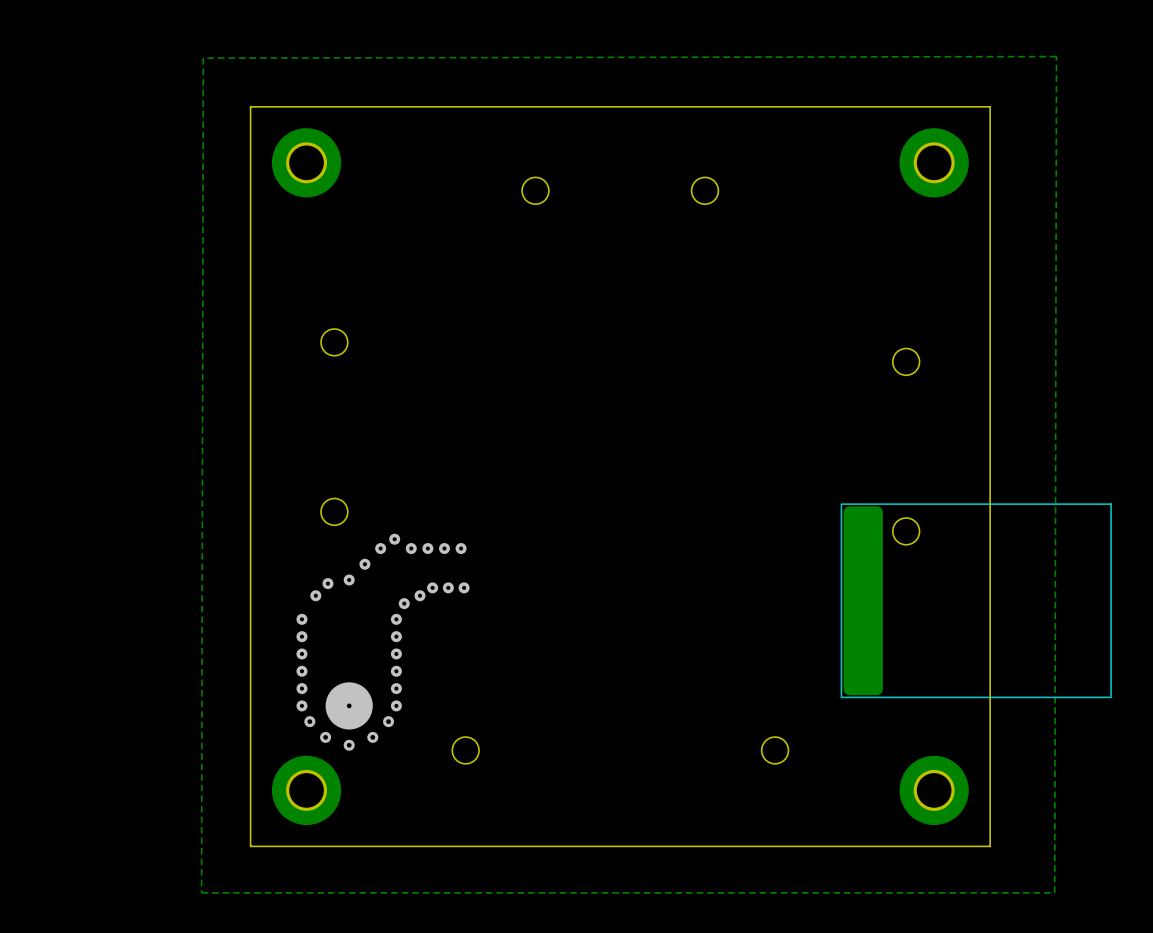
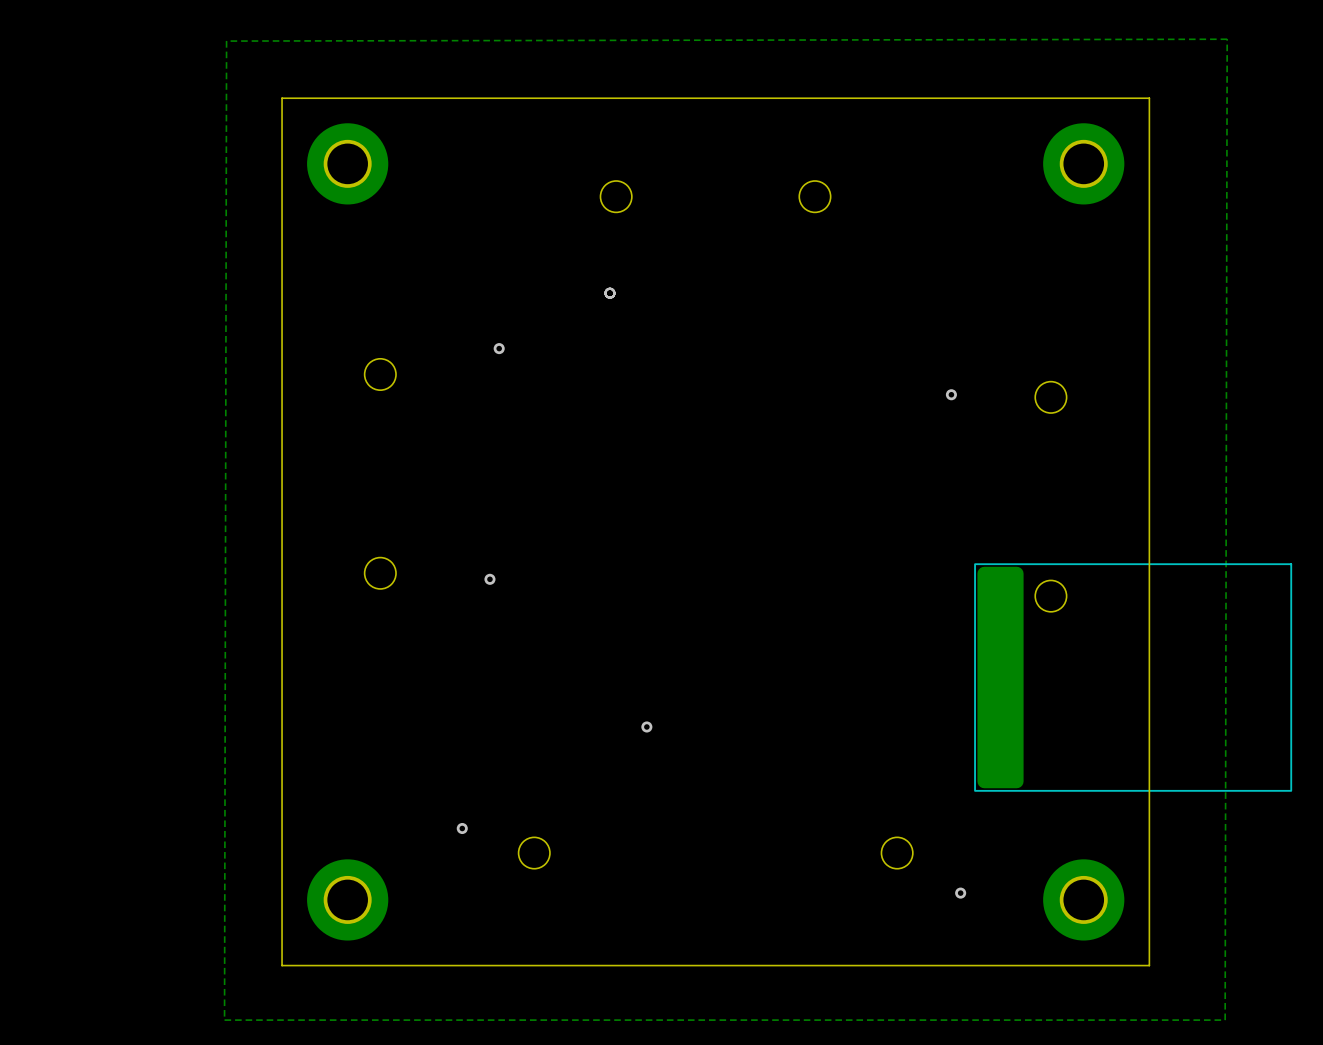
via: none -> (609, 293)
via: none -> (499, 348)
via: none -> (951, 394)
via: none -> (489, 579)
via: (394, 539) -> none
via: (380, 548) -> none
via: (411, 548) -> none
via: (427, 548) -> none
via: (444, 548) -> none
via: (461, 548) -> none
via: (364, 564) -> none
via: (349, 580) -> none
via: (327, 583) -> none
via: (432, 587) -> none
via: (448, 587) -> none
via: (464, 587) -> none
via: (315, 595) -> none
via: (420, 595) -> none
via: (404, 603) -> none
via: (301, 619) -> none
via: (396, 619) -> none
via: (301, 636) -> none
via: (396, 636) -> none
via: none -> (646, 726)
via: (301, 653) -> none
via: (396, 653) -> none
via: (301, 671) -> none
via: (396, 671) -> none
via: (301, 688) -> none
via: (396, 688) -> none
via: (301, 705) -> none
via: (349, 705) -> none
via: (396, 705) -> none
via: (309, 721) -> none
via: (388, 721) -> none
via: none -> (462, 828)
via: (325, 737) -> none
via: (372, 737) -> none
via: (349, 745) -> none
via: none -> (960, 893)

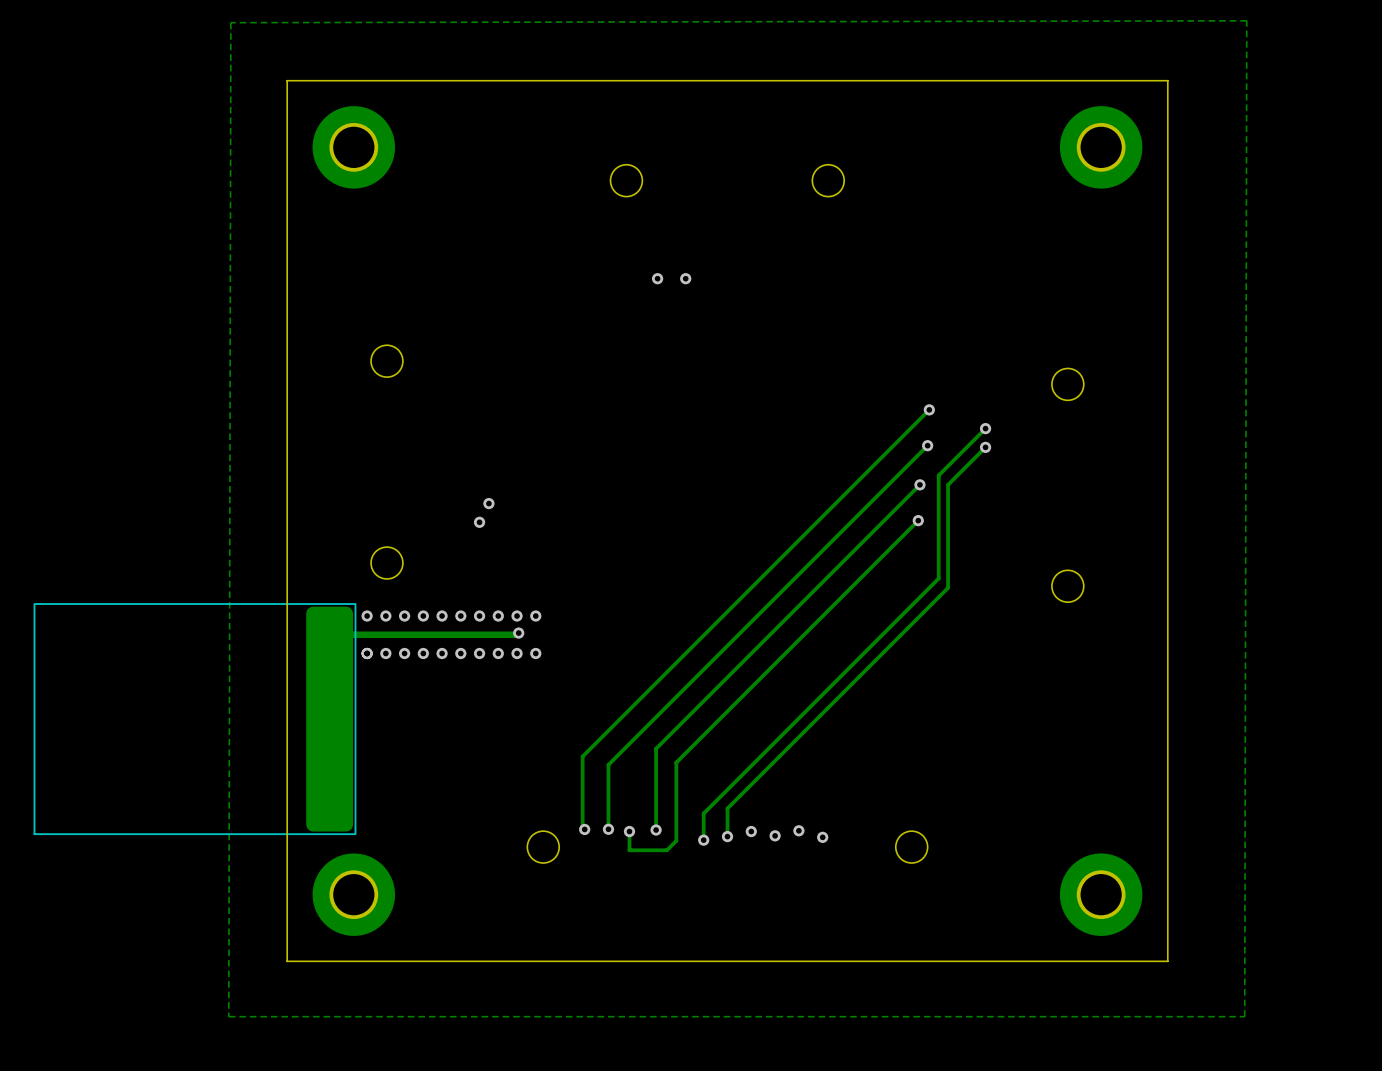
via: (609, 293) -> none
via: none -> (657, 278)
via: none -> (685, 278)
via: (499, 348) -> none
via: (951, 394) -> none
track: none -> (929, 409) (582, 756) (582, 827) (584, 829)
via: none -> (929, 409)
track: none -> (985, 428) (938, 475) (938, 578) (703, 813) (703, 840)
via: none -> (985, 428)
track: none -> (927, 445) (608, 764) (608, 829)
via: none -> (927, 445)
track: none -> (985, 447) (948, 484) (948, 587) (727, 808) (727, 836)
via: none -> (985, 447)
track: none -> (919, 484) (656, 748) (656, 830)
via: none -> (919, 484)
via: none -> (488, 503)
track: none -> (918, 520) (676, 762) (676, 840) (666, 850) (629, 850) (629, 831)
via: none -> (918, 520)
via: none -> (479, 522)
via: (489, 579) -> none
via: none -> (367, 616)
via: none -> (385, 616)
via: none -> (404, 616)
via: none -> (423, 616)
via: none -> (442, 616)
via: none -> (460, 616)
via: none -> (479, 616)
via: none -> (498, 616)
via: none -> (517, 616)
via: none -> (535, 616)
track: none -> (518, 633) (517, 634) (329, 634)
via: none -> (518, 633)
via: none -> (367, 653)
via: none -> (385, 653)
via: none -> (404, 653)
via: none -> (423, 653)
via: none -> (442, 653)
via: none -> (460, 653)
via: none -> (479, 653)
via: none -> (498, 653)
via: none -> (517, 653)
via: none -> (535, 653)
part: (1133, 677) -> none
part: none -> (194, 719)
via: (646, 726) -> none
via: (462, 828) -> none
via: none -> (584, 829)
via: none -> (608, 829)
via: none -> (656, 830)
via: none -> (798, 830)
via: none -> (629, 831)
via: none -> (751, 831)
via: none -> (775, 835)
via: none -> (727, 836)
via: none -> (822, 837)
via: none -> (703, 840)
via: (960, 893) -> none

